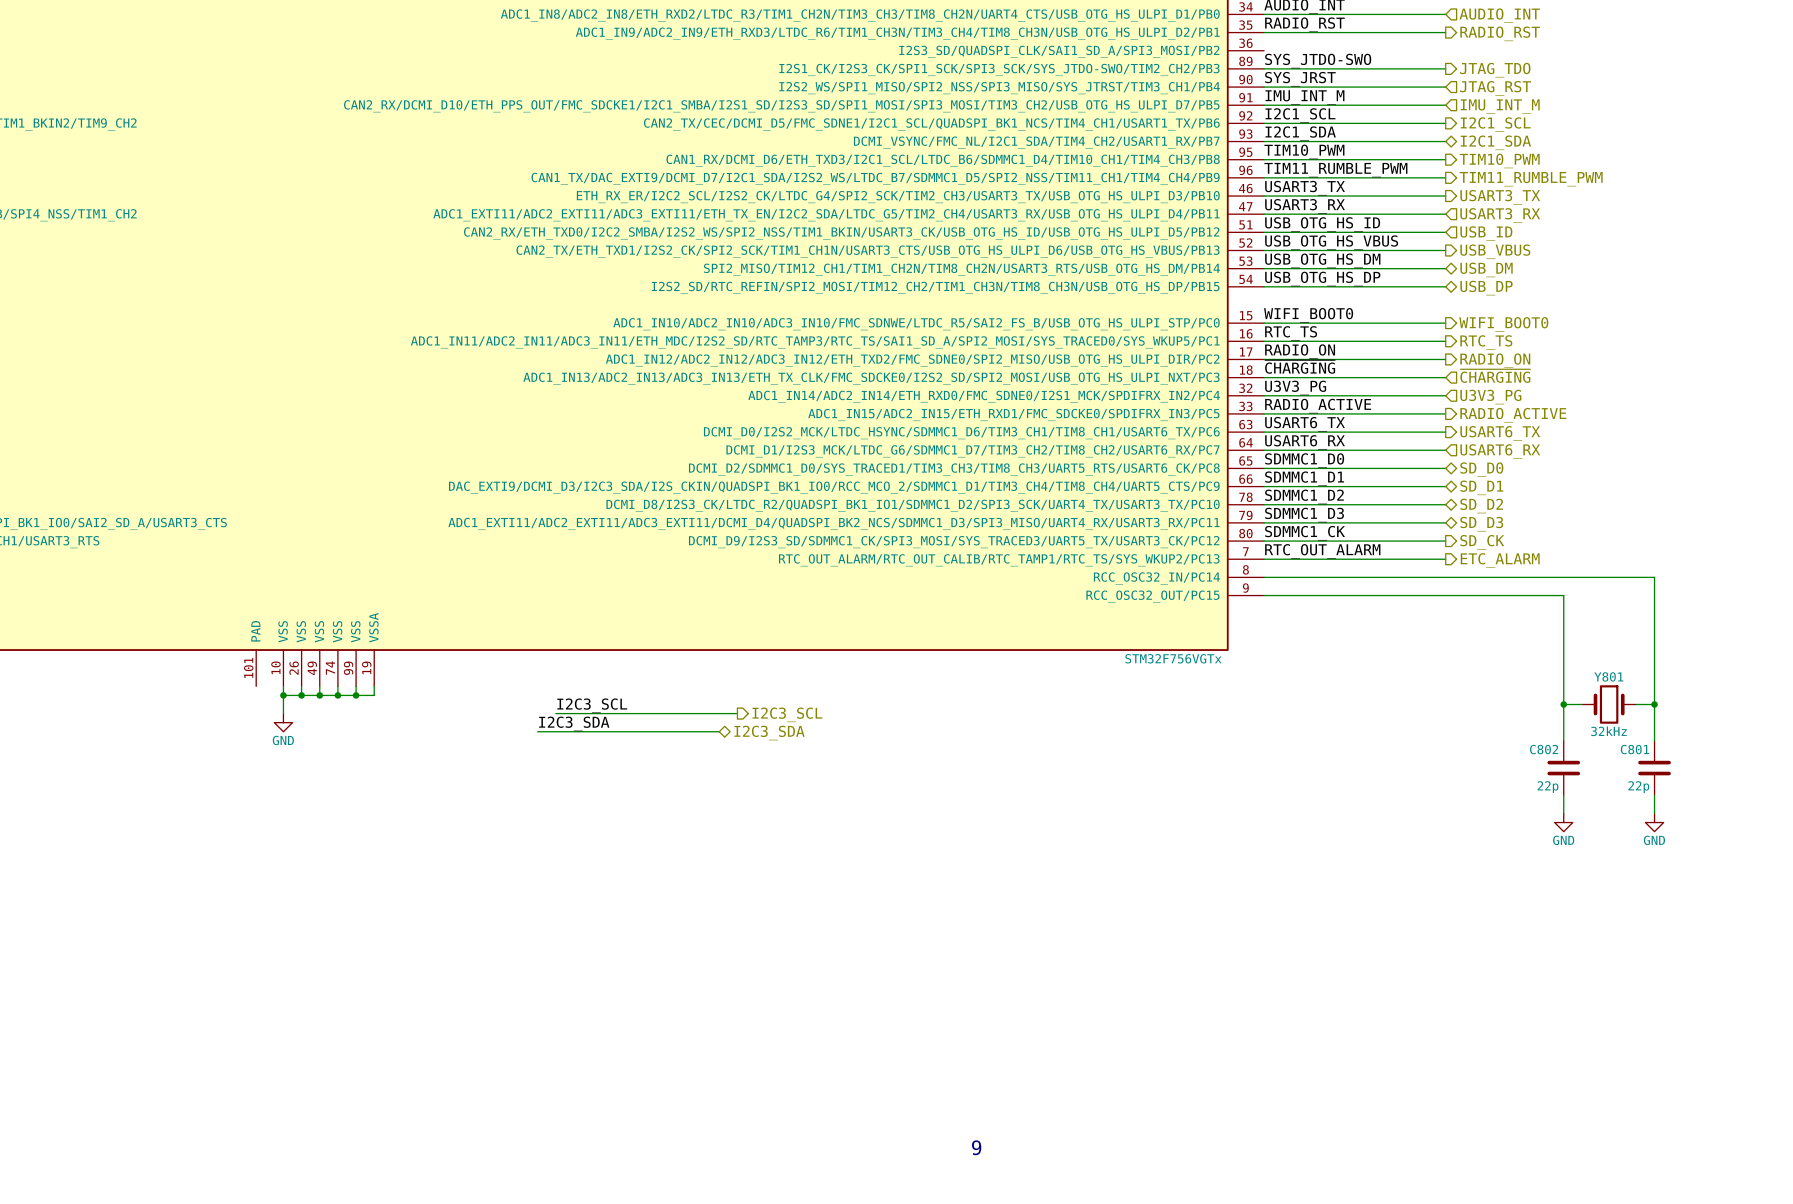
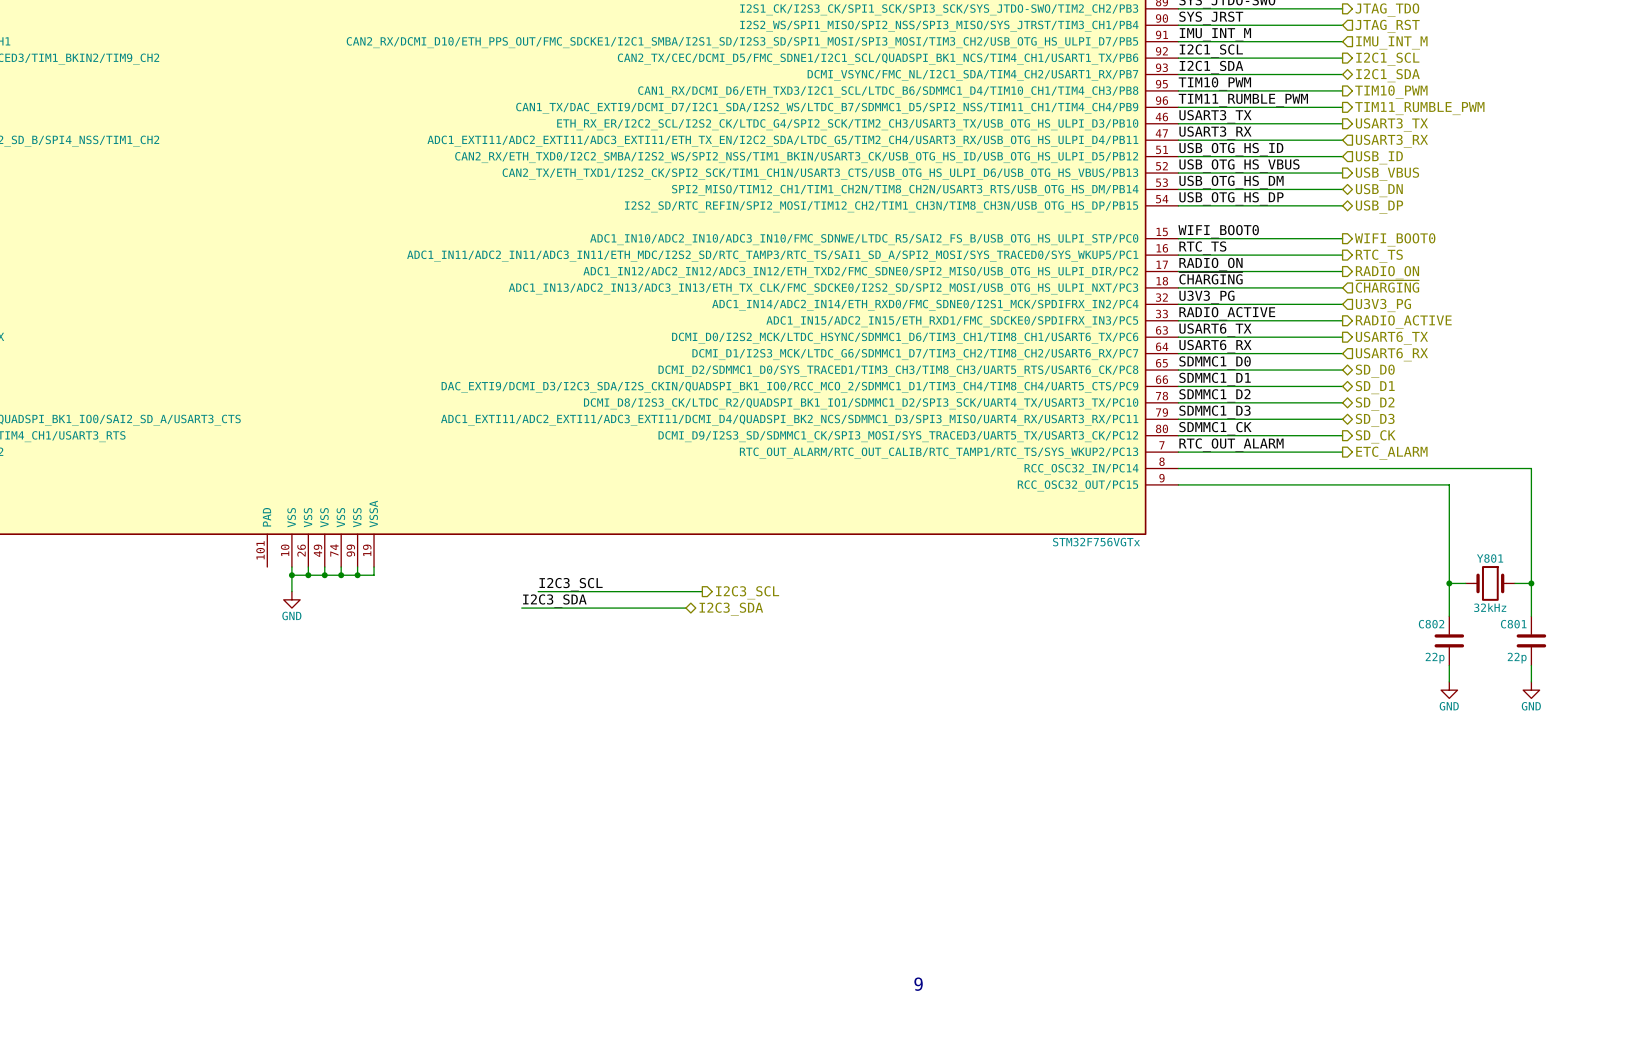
hierarchical label: USB_DM (1486, 269) -> USB_DN (1379, 190)

